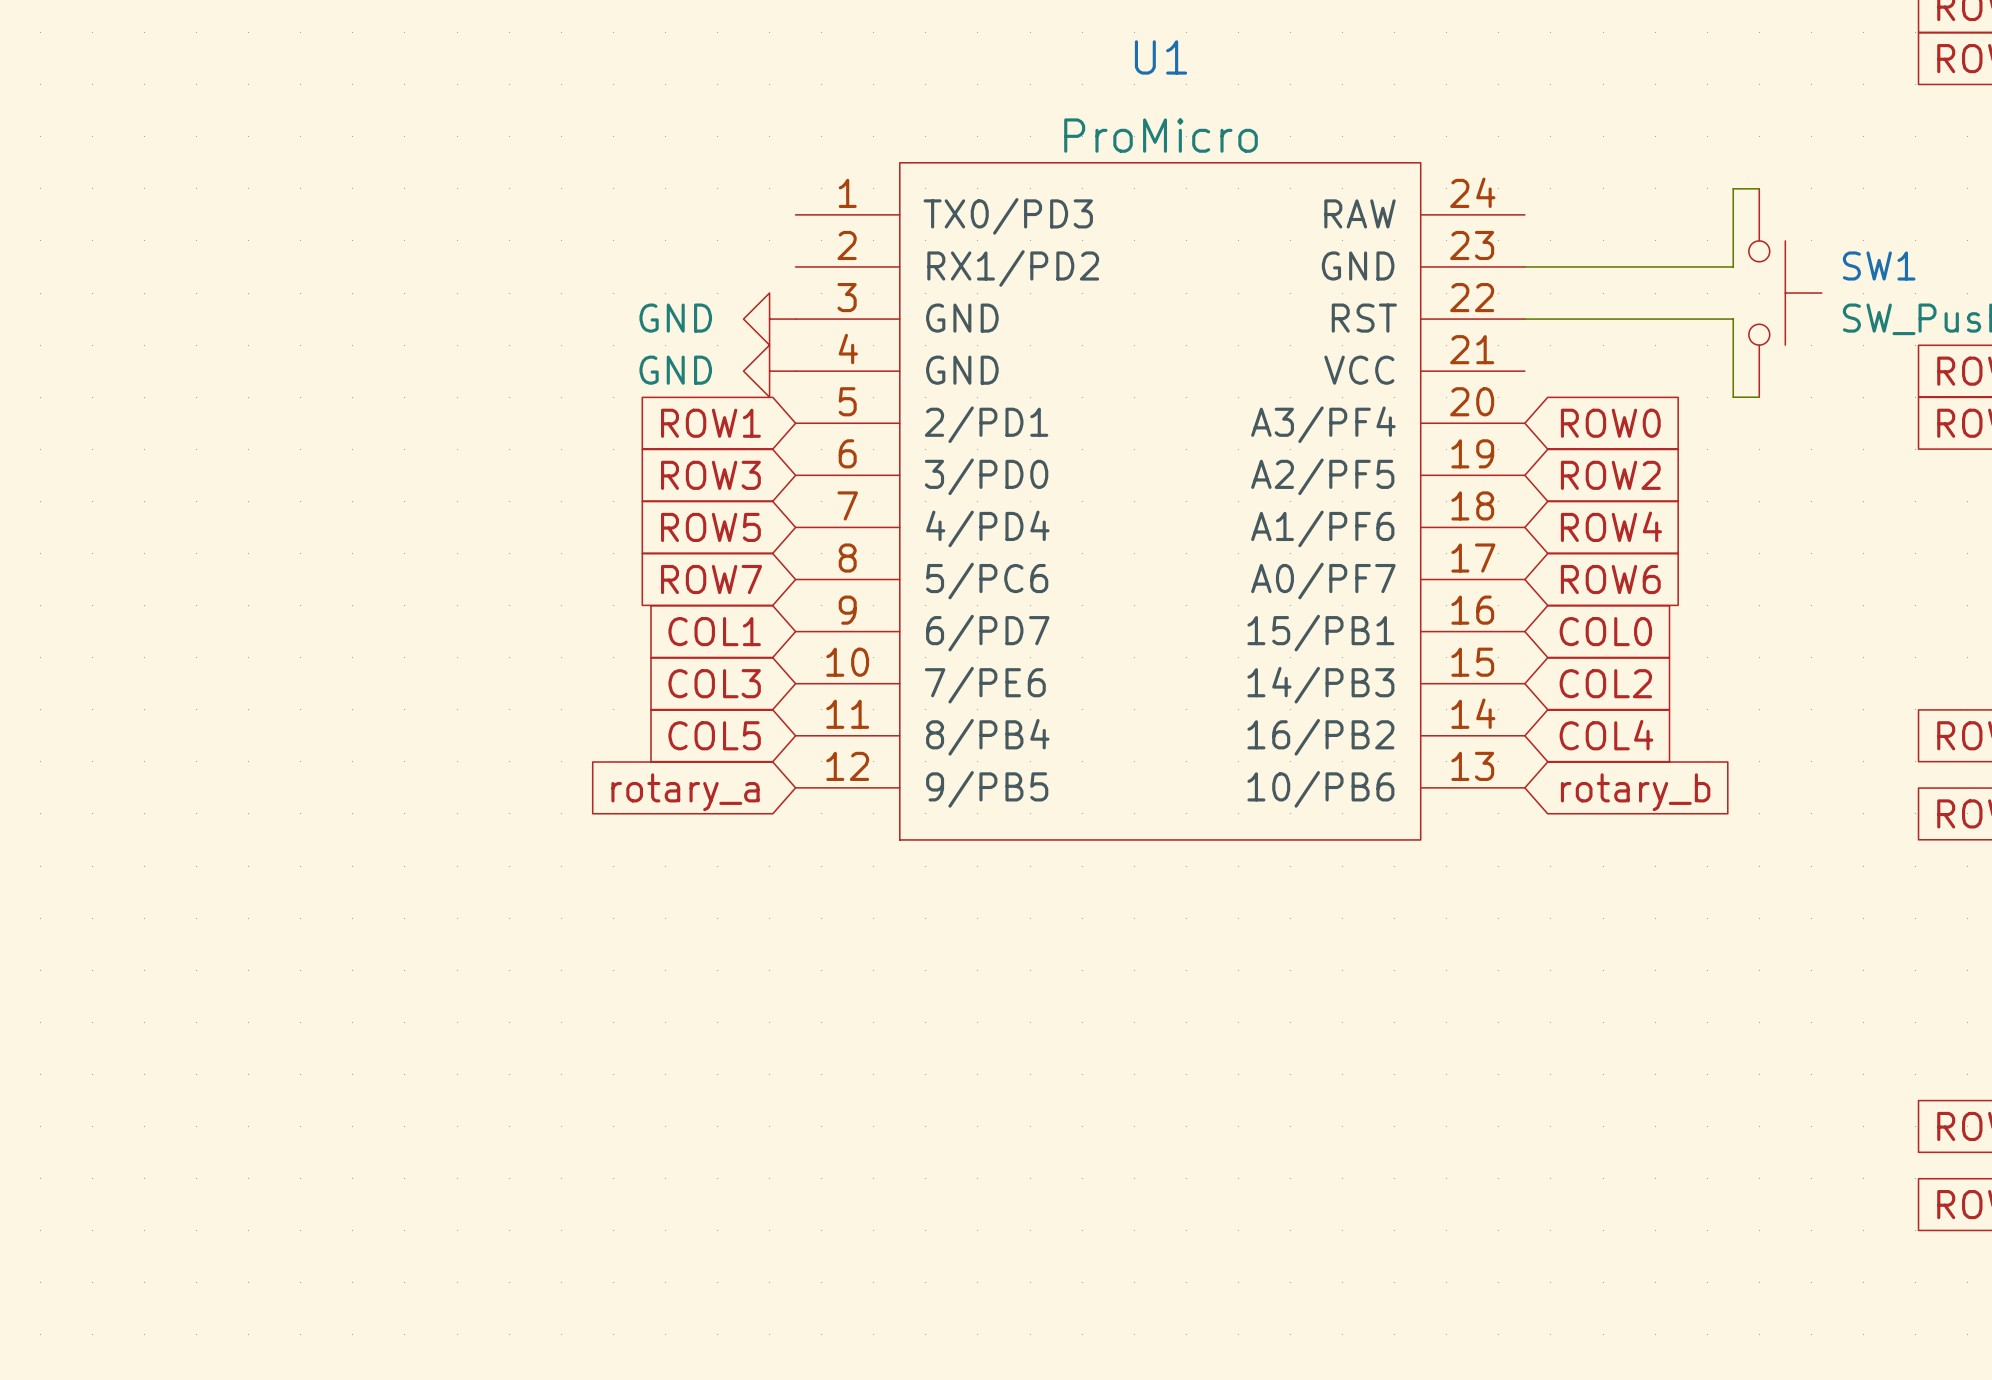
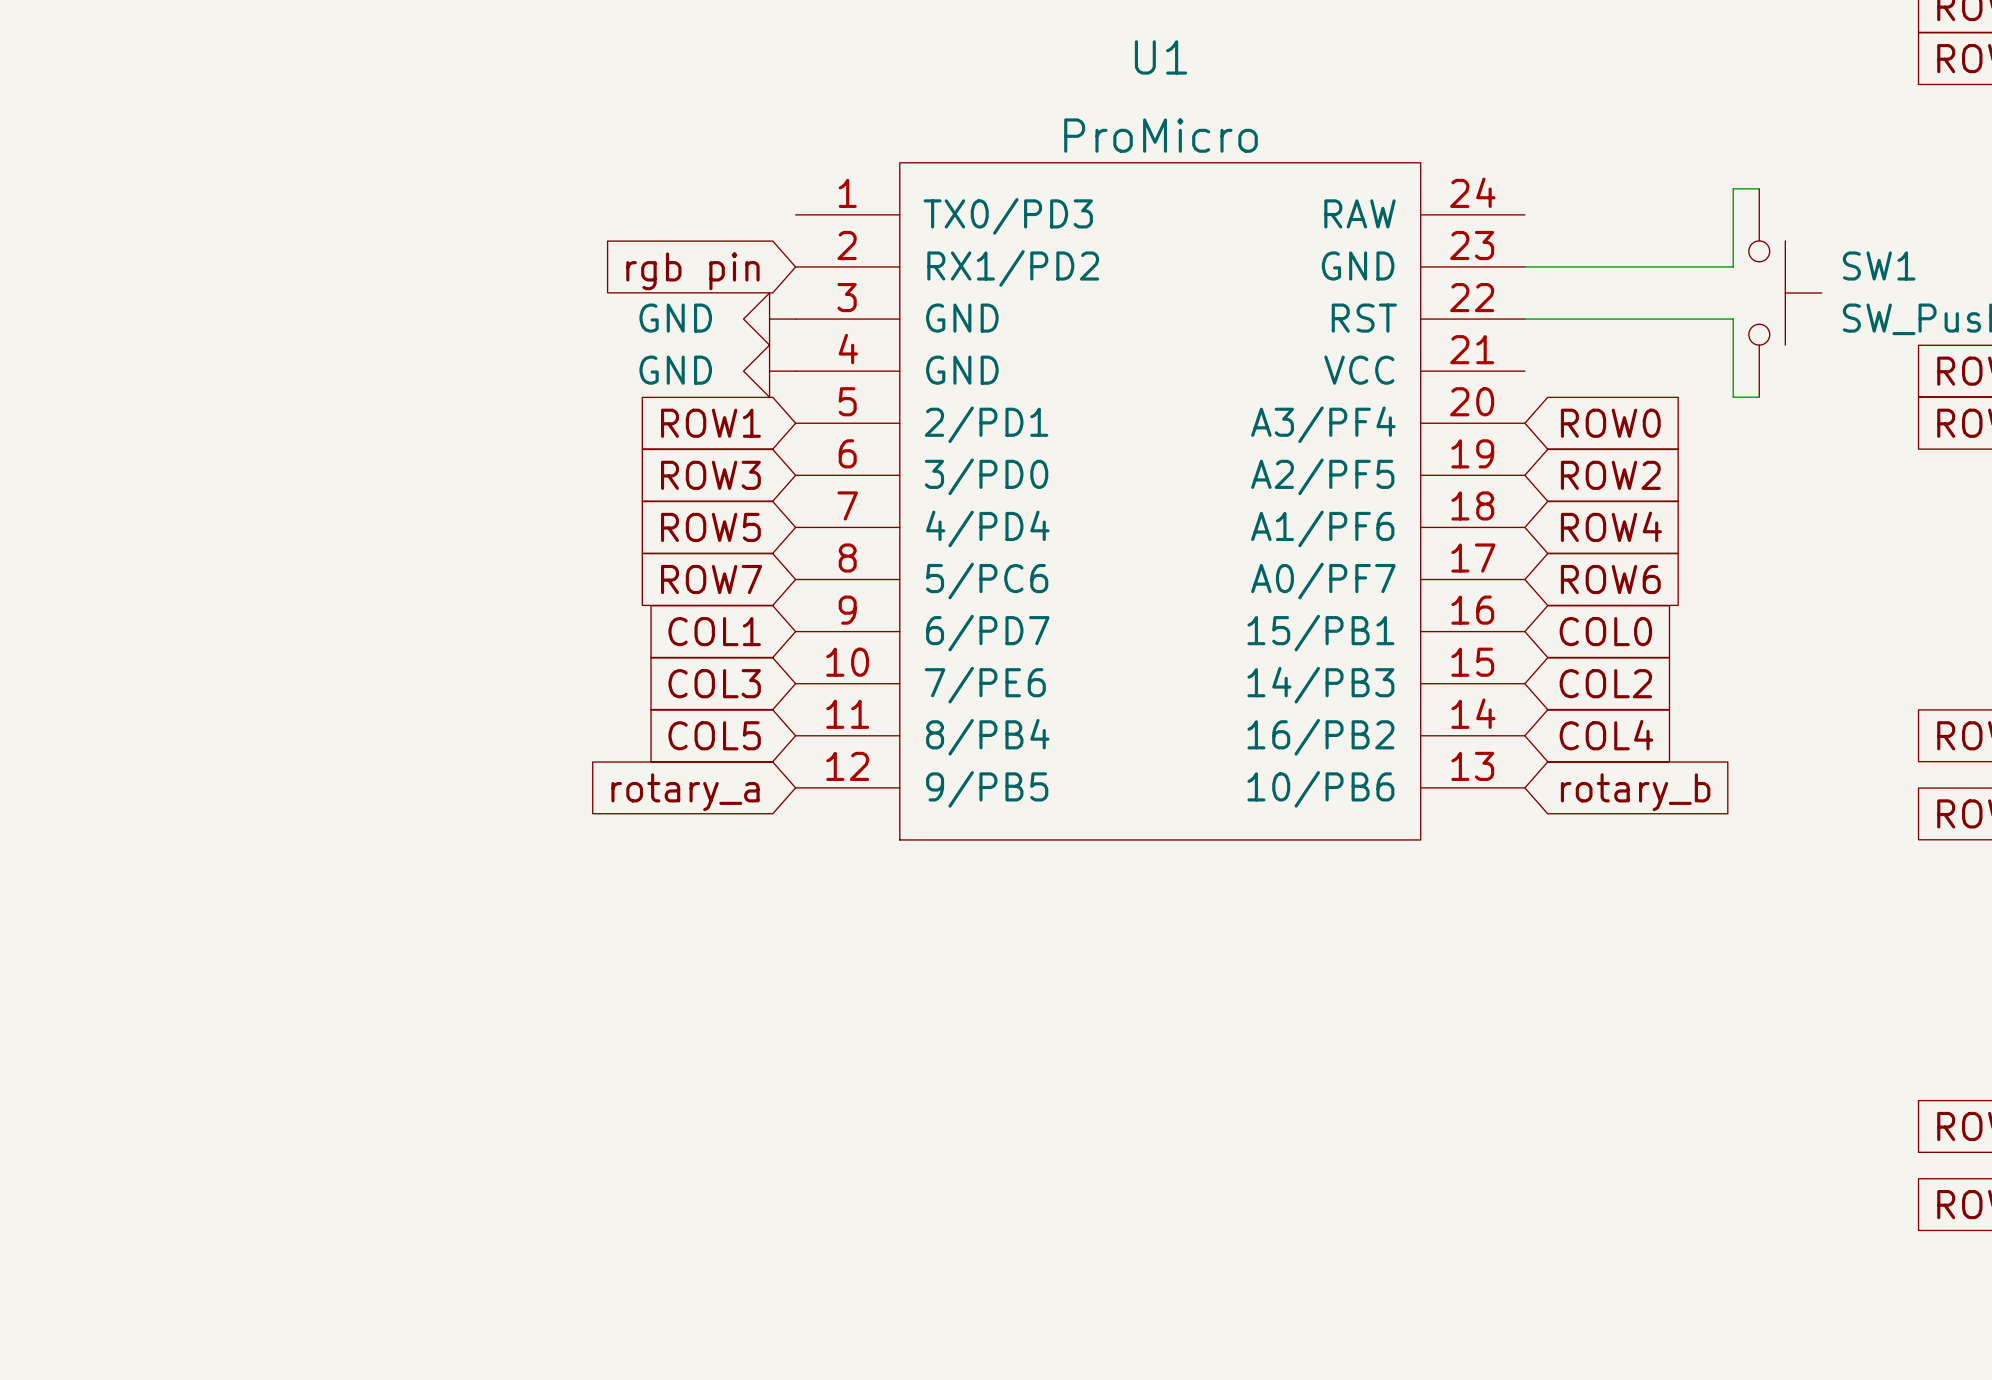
global label: none -> rgb pin (692, 271)

